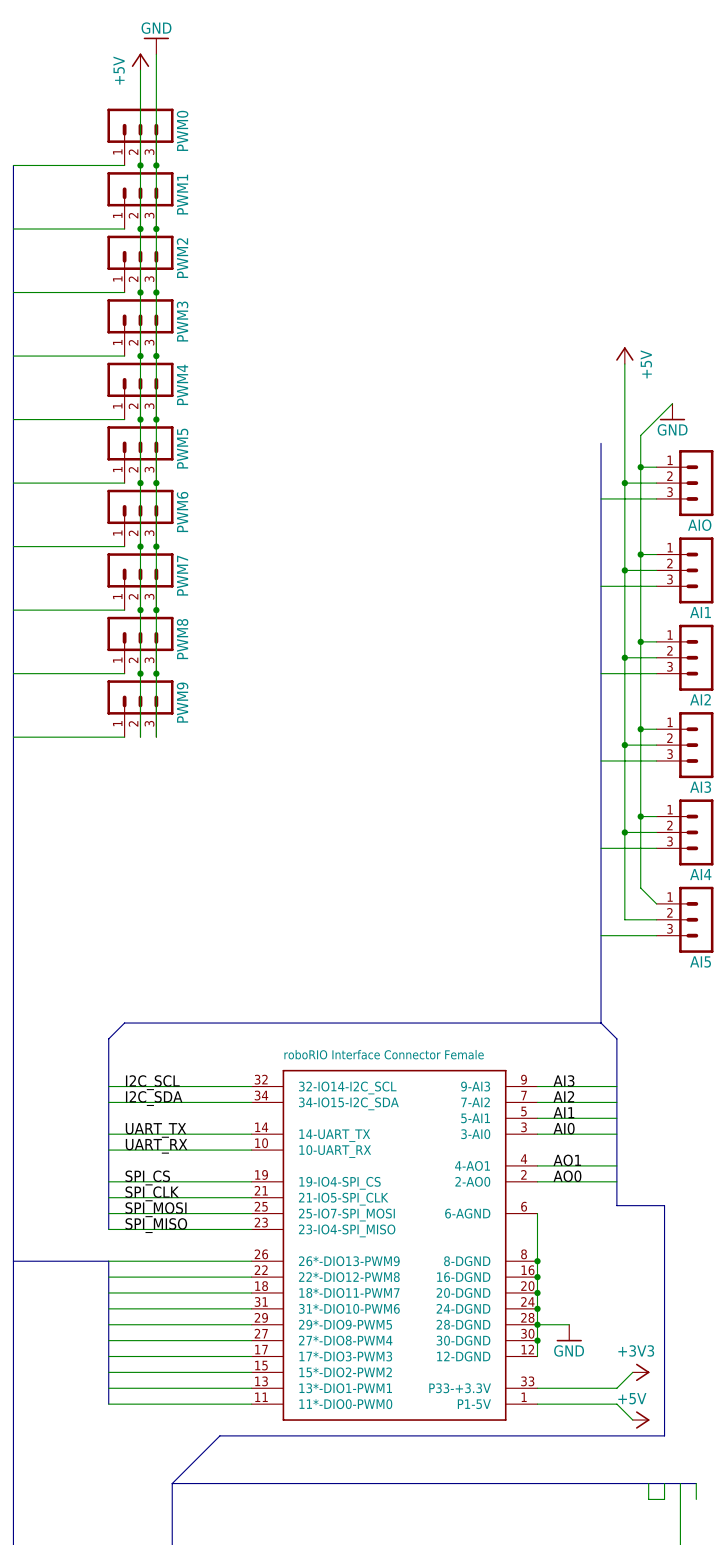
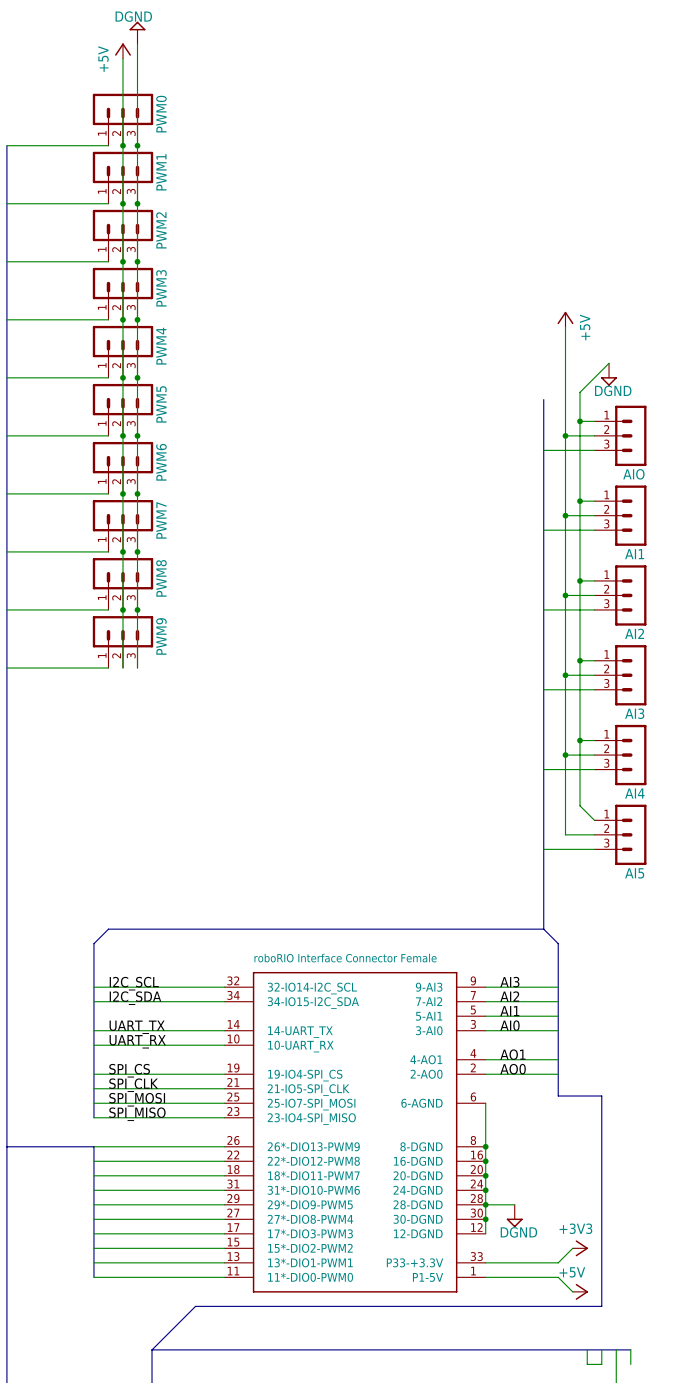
power symbol: GND (156, 45) -> DGND (137, 32)
power symbol: GND (672, 412) -> DGND (609, 374)
power symbol: GND (569, 1333) -> DGND (514, 1216)

